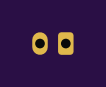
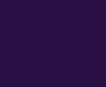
part: (52, 43) -> none

